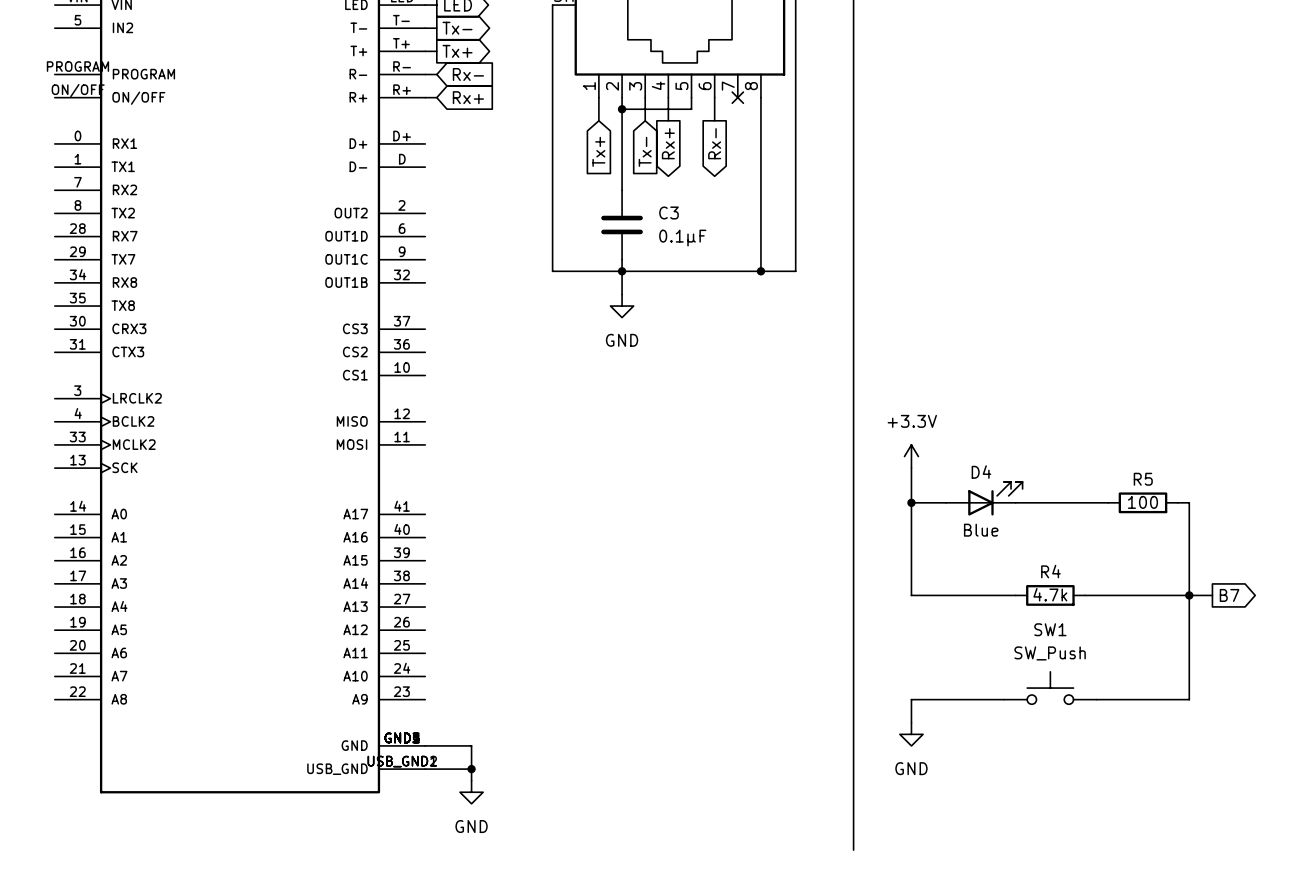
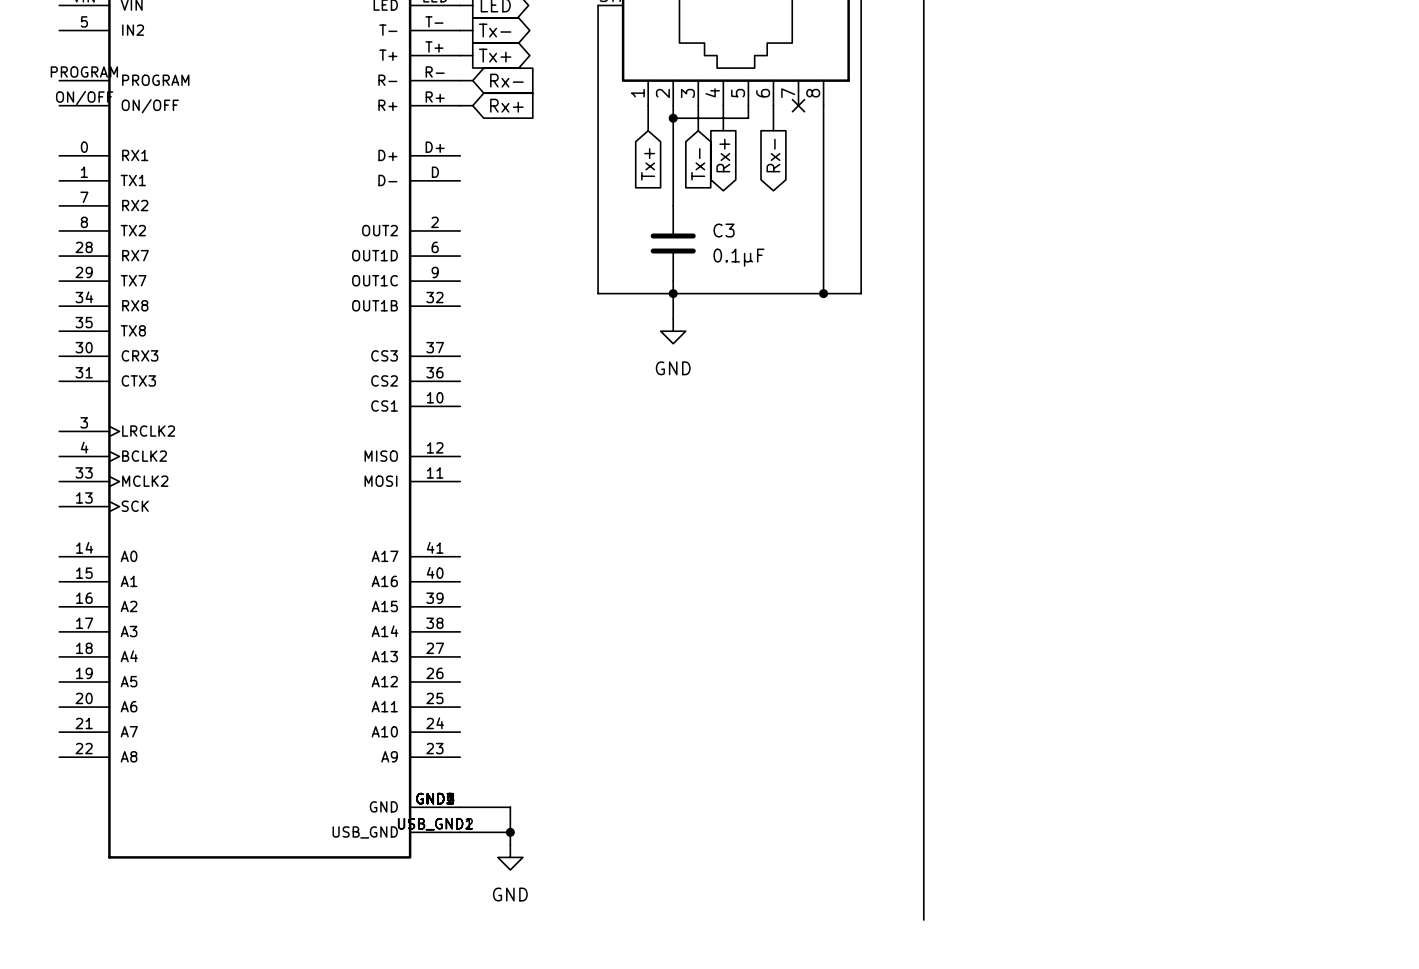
power symbol: +3.3V (911, 456) -> none
wire: (911, 468) (911, 595) (1015, 595) -> none
D4: Blue (984, 498) -> none
wire: (911, 502) (946, 502) -> none
junction: (911, 502) -> none
wire: (1015, 502) (1108, 502) -> none
R5: 100 (1142, 502) -> none
wire: (1177, 502) (1189, 502) (1189, 699) (1096, 699) -> none
R4: 4.7k (1050, 595) -> none
wire: (1085, 595) (1212, 595) -> none
junction: (1189, 595) -> none
global label: B7 (1229, 595) -> none
SW1: SW_Push (1050, 688) -> none
wire: (1004, 699) (911, 699) (911, 722) -> none
power symbol: GND (911, 734) -> none

